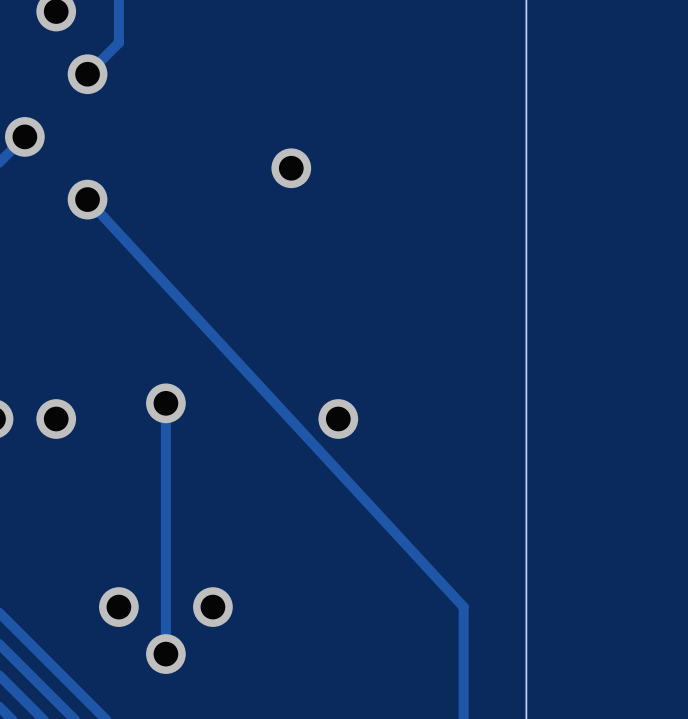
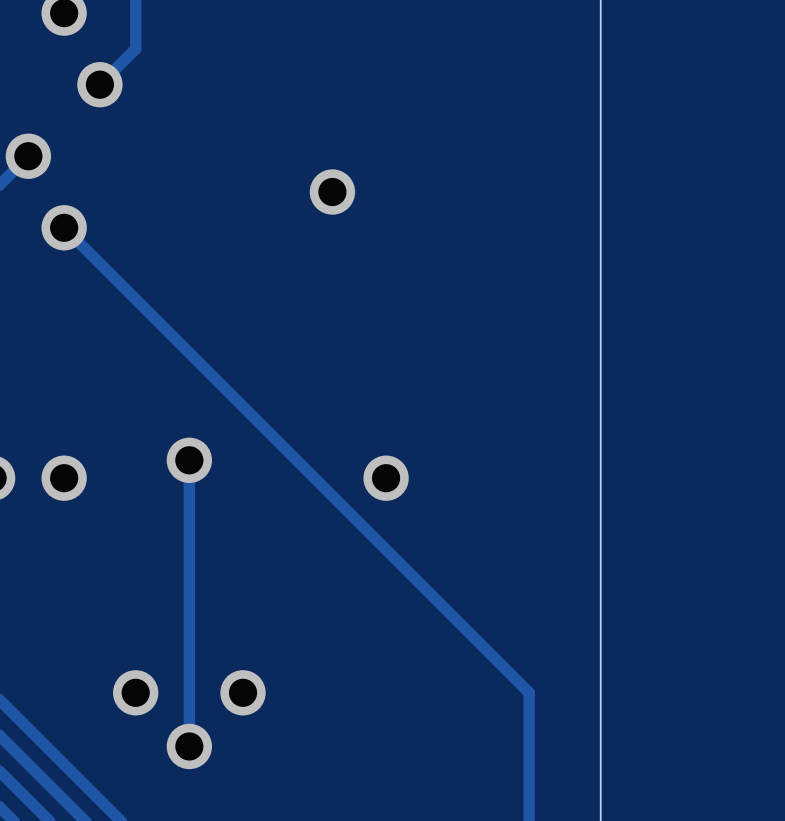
track: (87, 199) (463, 607) -> (64, 227) (529, 692)
via position: (87, 199) -> (64, 227)

